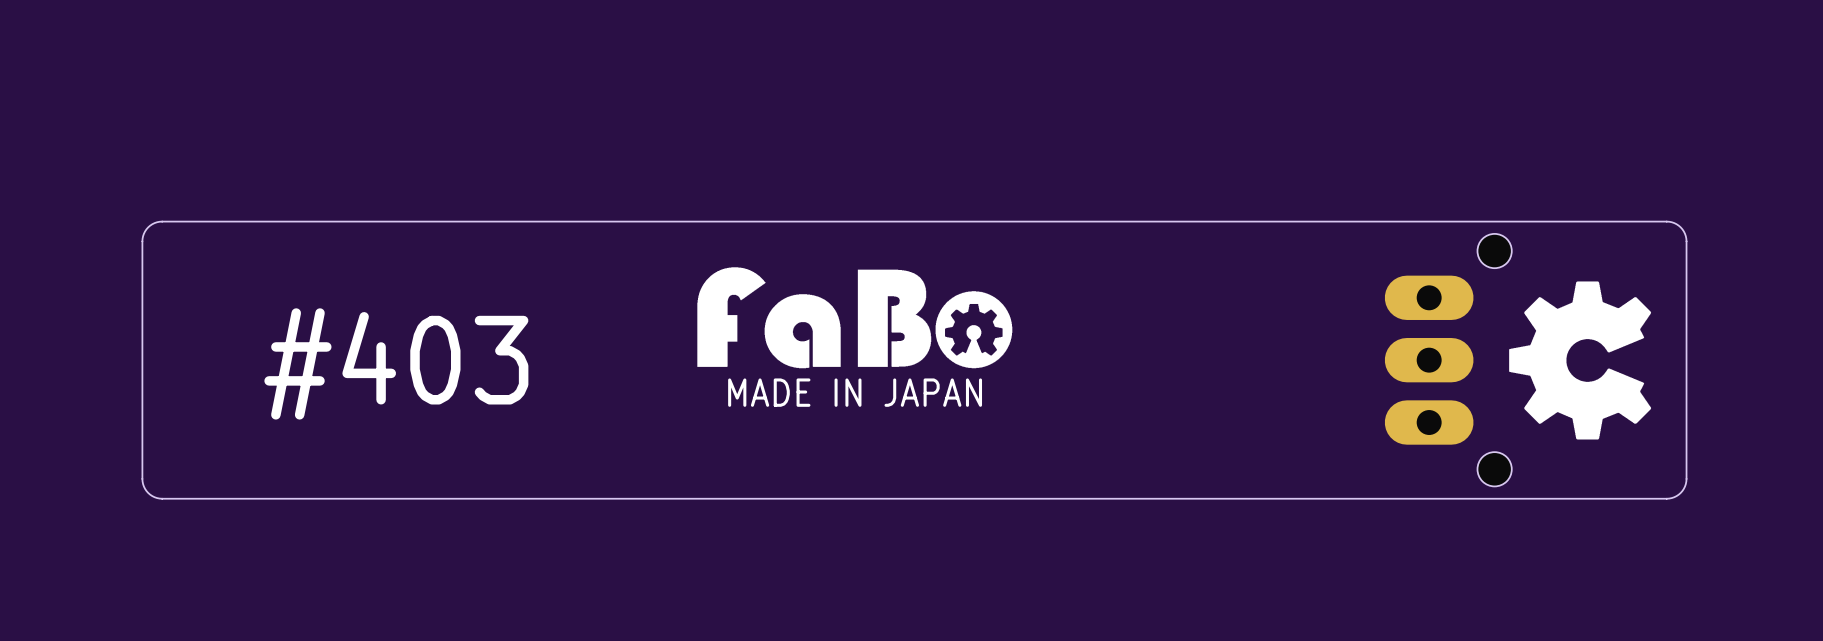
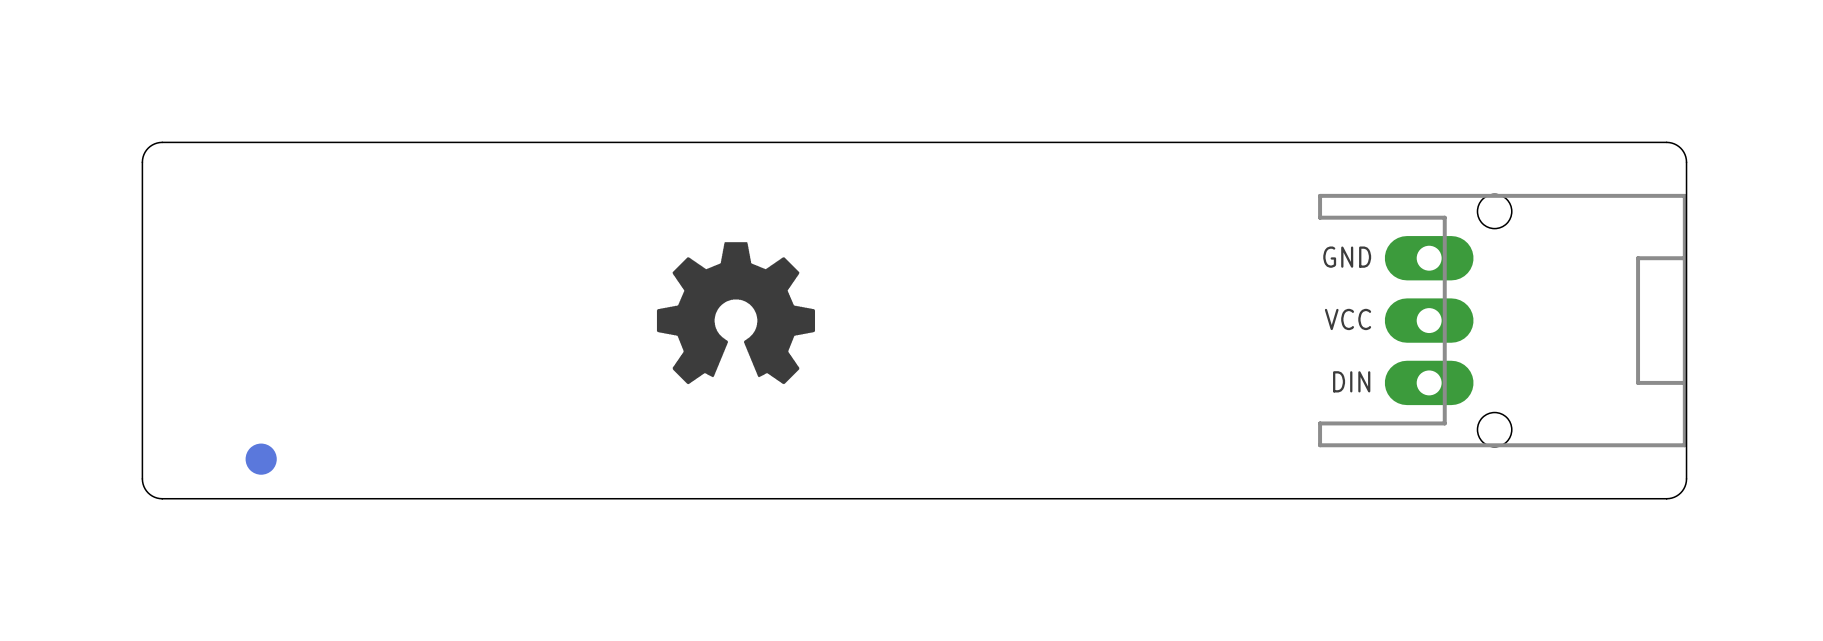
board edge: (1686, 241) (1685, 233) (1680, 227) (1674, 223) (1666, 221) (162, 221) (154, 223) (148, 227) (143, 233) (142, 241) -> (1686, 241) (1685, 157) (1678, 146) (1666, 142) (162, 142) (150, 146) (143, 157) (142, 241)
drawing: none -> [656, 242, 816, 385]
text: none -> GND (1347, 257)
drawing: [697, 267, 1013, 369] -> none
drawing: [1509, 281, 1652, 440] -> none
text: none -> VCC (1348, 319)
part side: top (1448, 360) -> bottom (1502, 320)
text: #403 (396, 363) -> none
text: none -> DIN (1351, 381)
text: MADE IN JAPAN (855, 392) -> none
part: none -> (261, 459)

